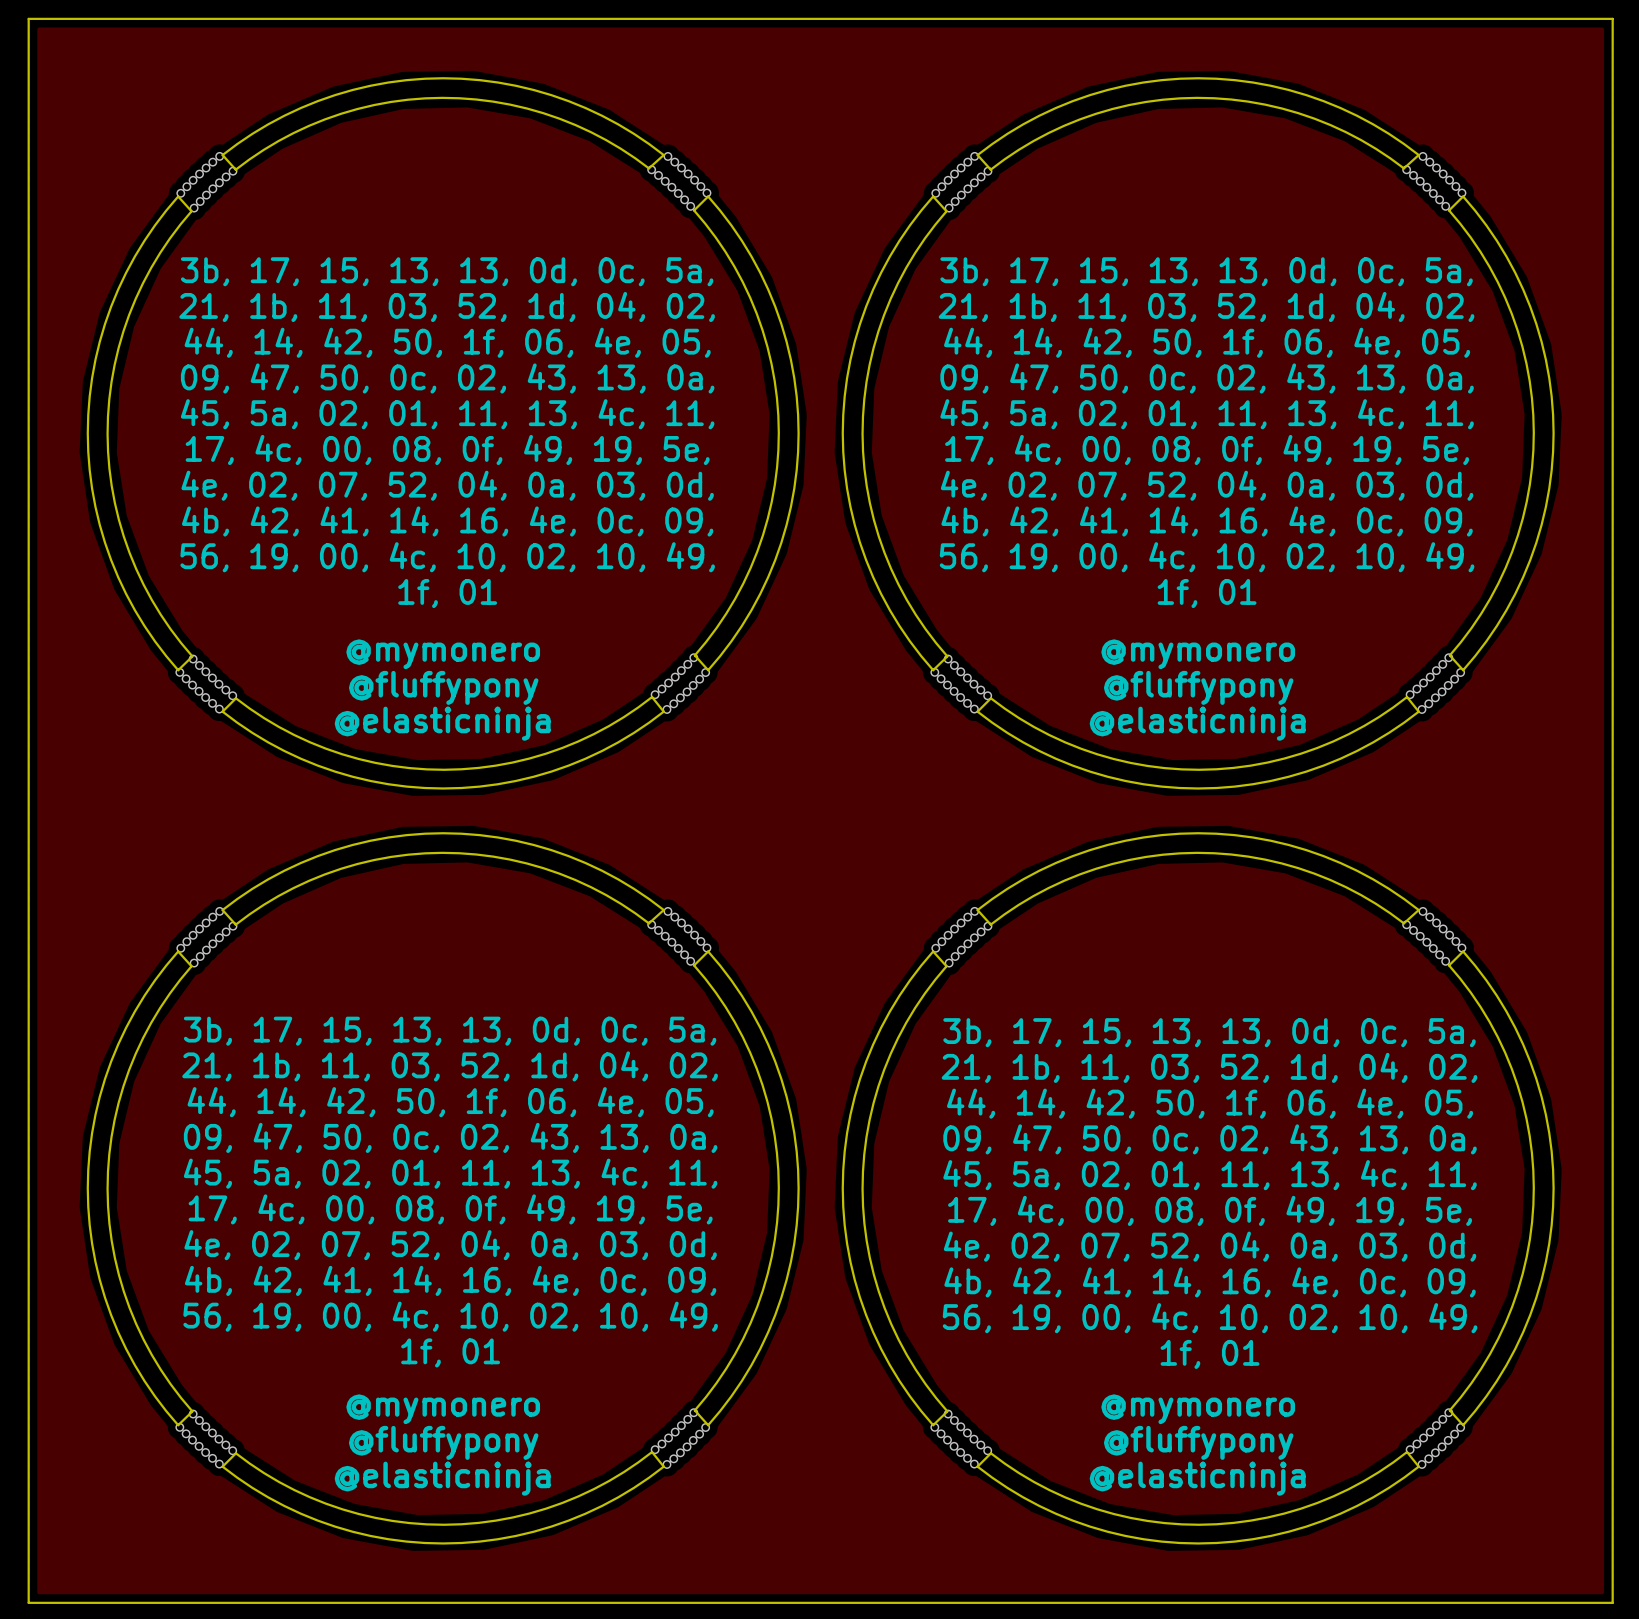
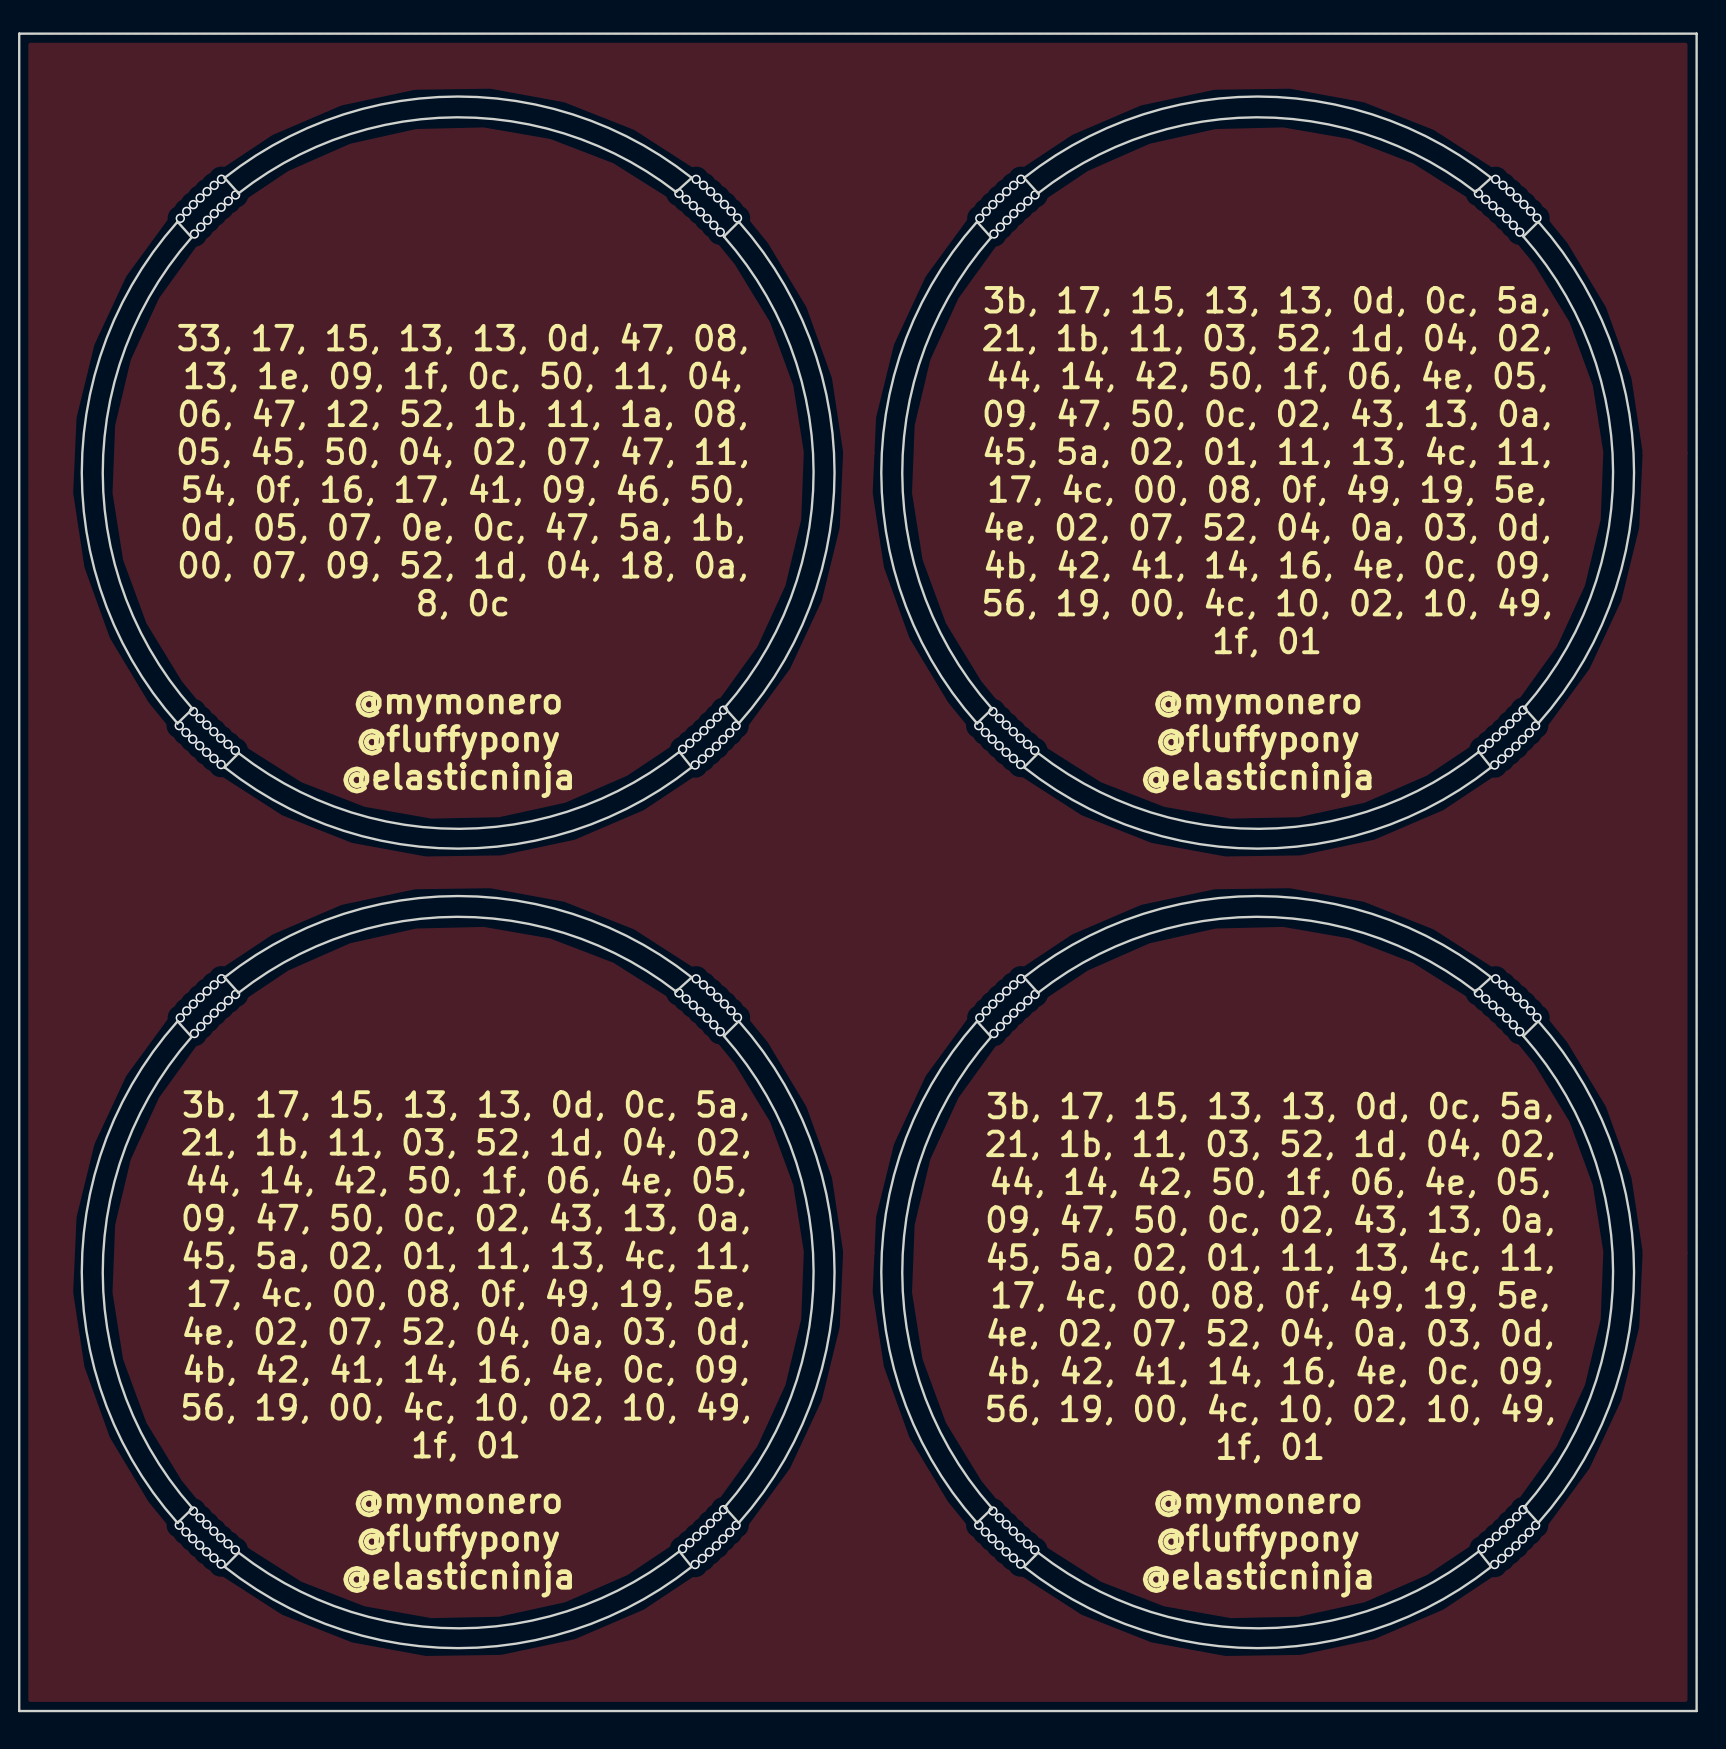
text: 3b, 17, 15, 13, 13, 0d, 0c, 5a, (447, 271) -> none
text: 21, 1b, 11, 03, 52, 1d, 04, 02, (447, 306) -> 33, 17, 15, 13, 13, 0d, 47, 08, (462, 338)
text: 44, 14, 42, 50, 1f, 06, 4e, 05, (447, 342) -> 13, 1e, 09, 1f, 0c, 50, 11, 04, (462, 376)
text: 09, 47, 50, 0c, 02, 43, 13, 0a, (447, 378) -> 06, 47, 12, 52, 1b, 11, 1a, 08, (462, 414)
text: 45, 5a, 02, 01, 11, 13, 4c, 11, (447, 414) -> 05, 45, 50, 04, 02, 07, 47, 11, (462, 452)
text: 17, 4c, 00, 08, 0f, 49, 19, 5e, (447, 449) -> 54, 0f, 16, 17, 41, 09, 46, 50, (462, 490)
text: 4e, 02, 07, 52, 04, 0a, 03, 0d, (447, 485) -> 0d, 05, 07, 0e, 0c, 47, 5a, 1b, (462, 528)
text: 4b, 42, 41, 14, 16, 4e, 0c, 09, (447, 521) -> 00, 07, 09, 52, 1d, 04, 18, 0a, (462, 565)
text: 56, 19, 00, 4c, 10, 02, 10, 49, (447, 557) -> 8, 0c (462, 604)
text: 1f, 01 (447, 593) -> none

